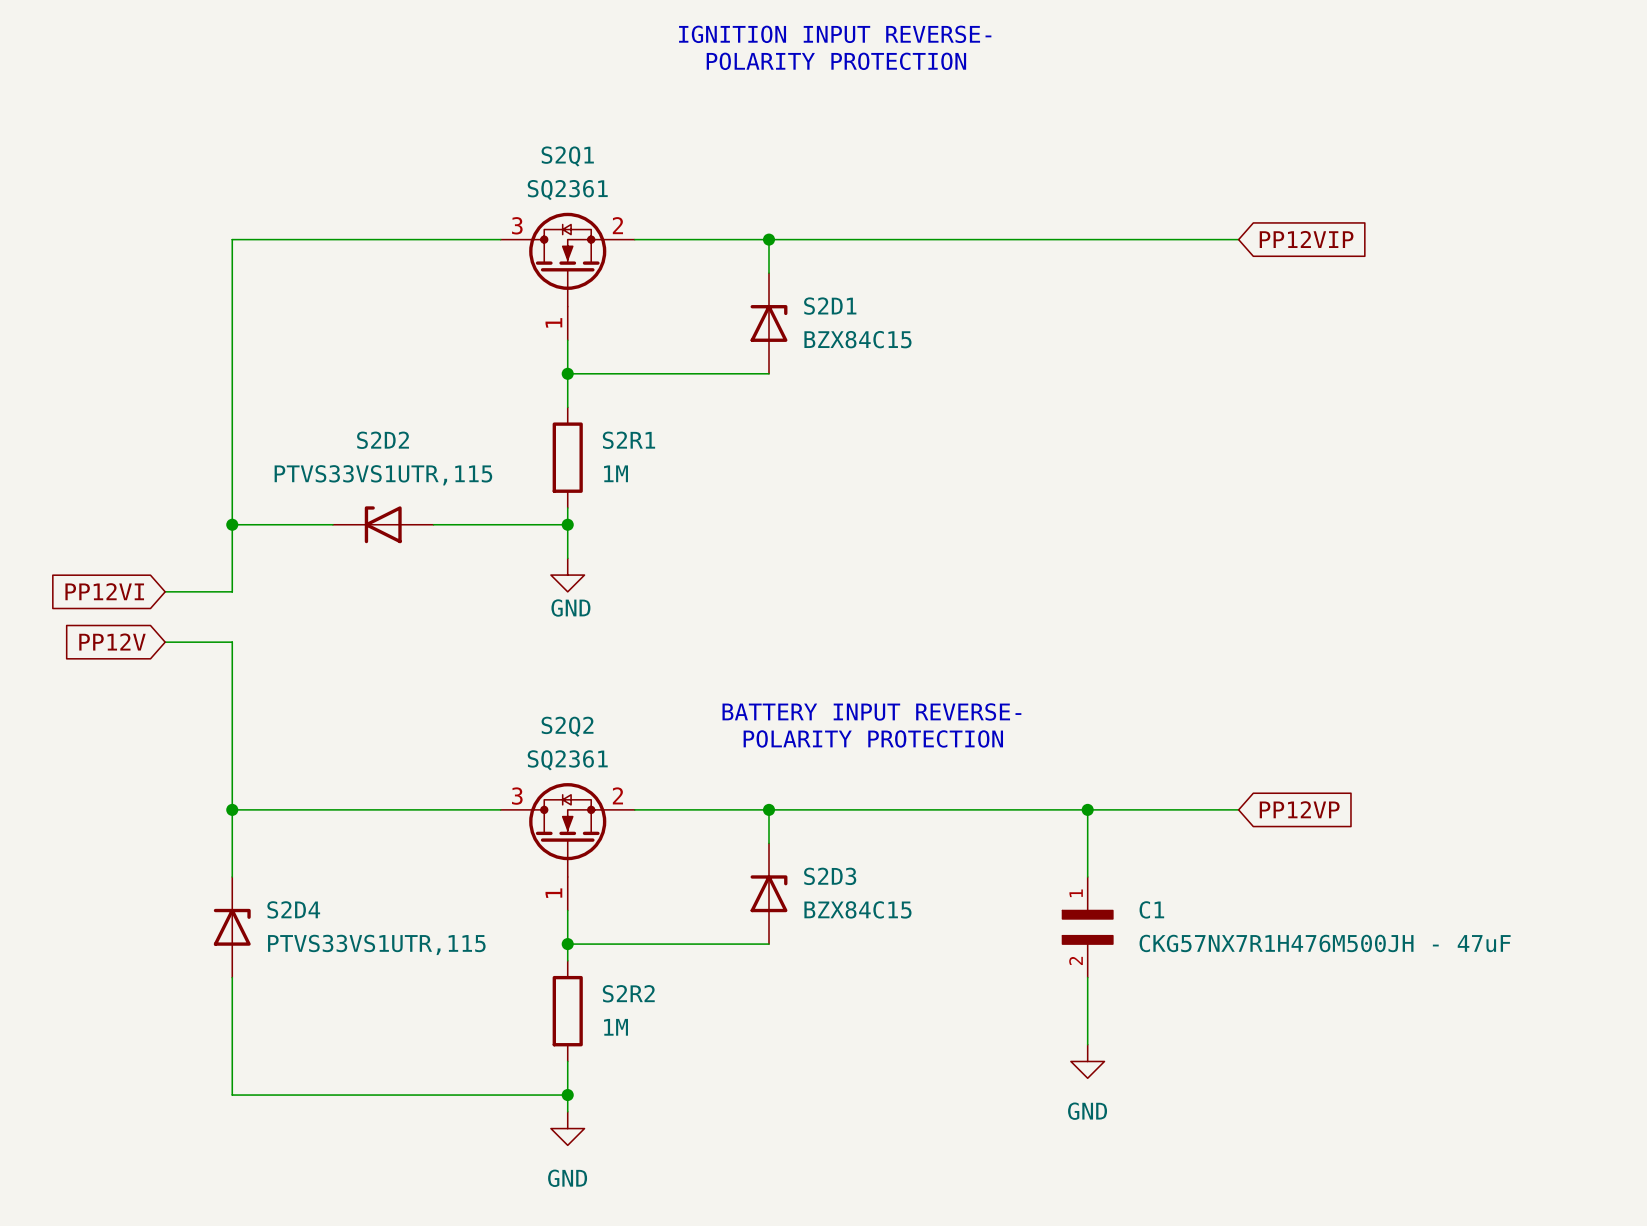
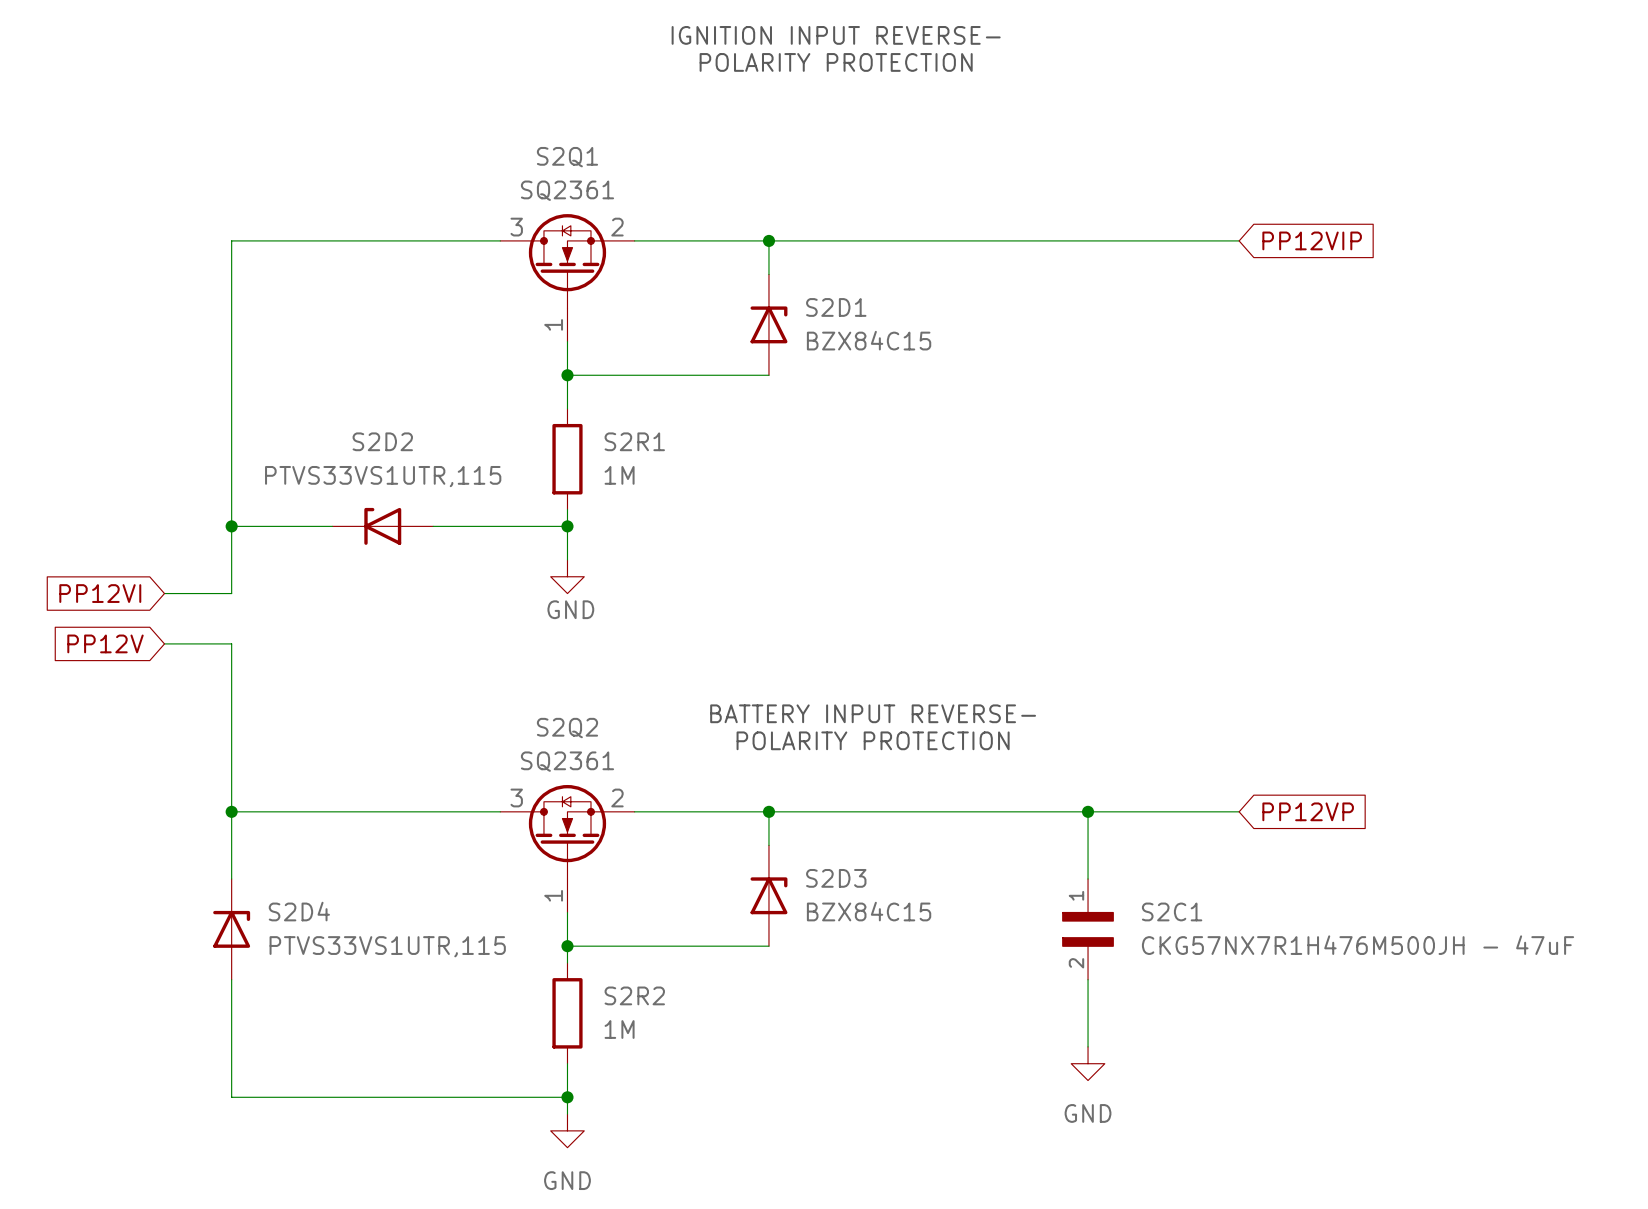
C1 name: C1 (1151, 909) -> S2C1 (1172, 911)

